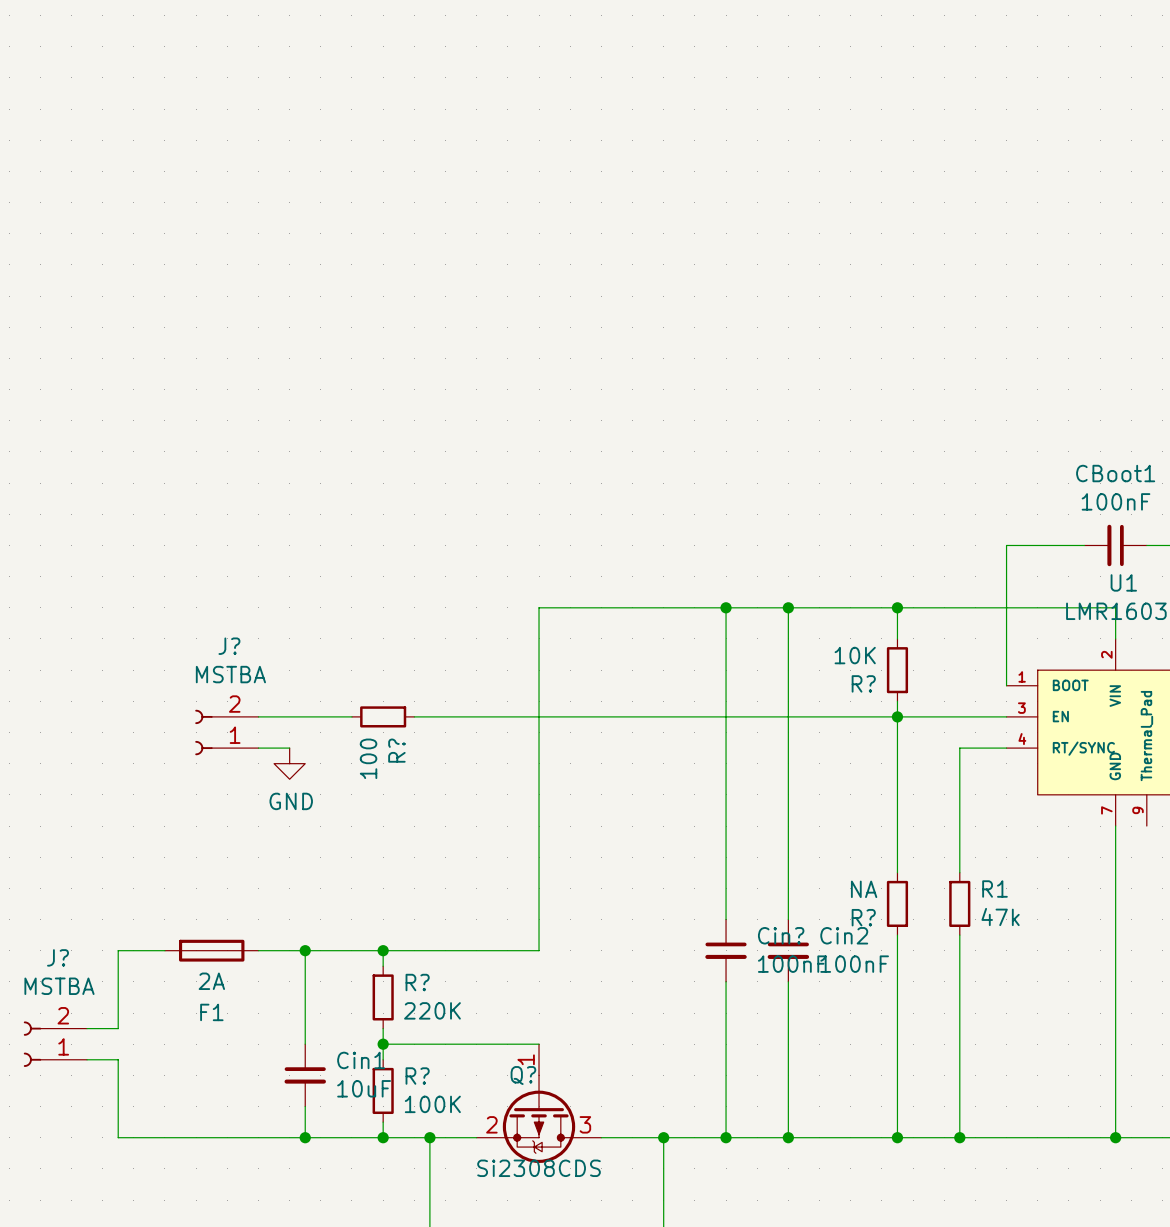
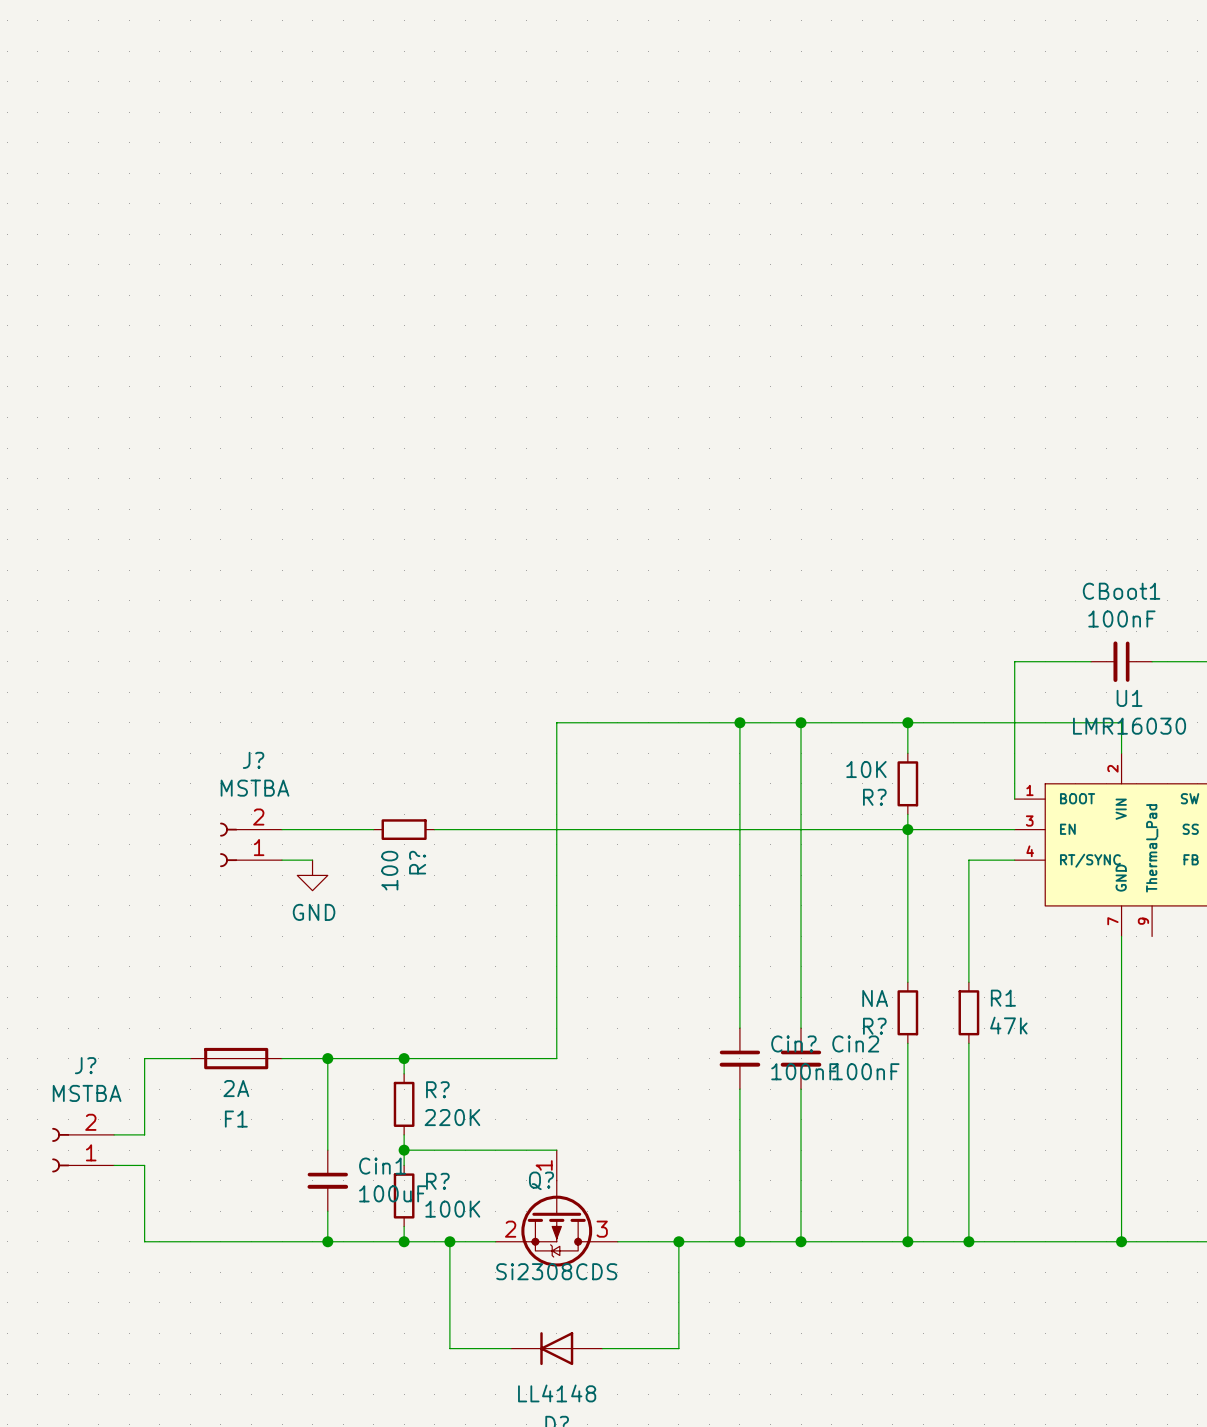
Cin1 value: 10uF (364, 1088) -> 100uF (392, 1193)

